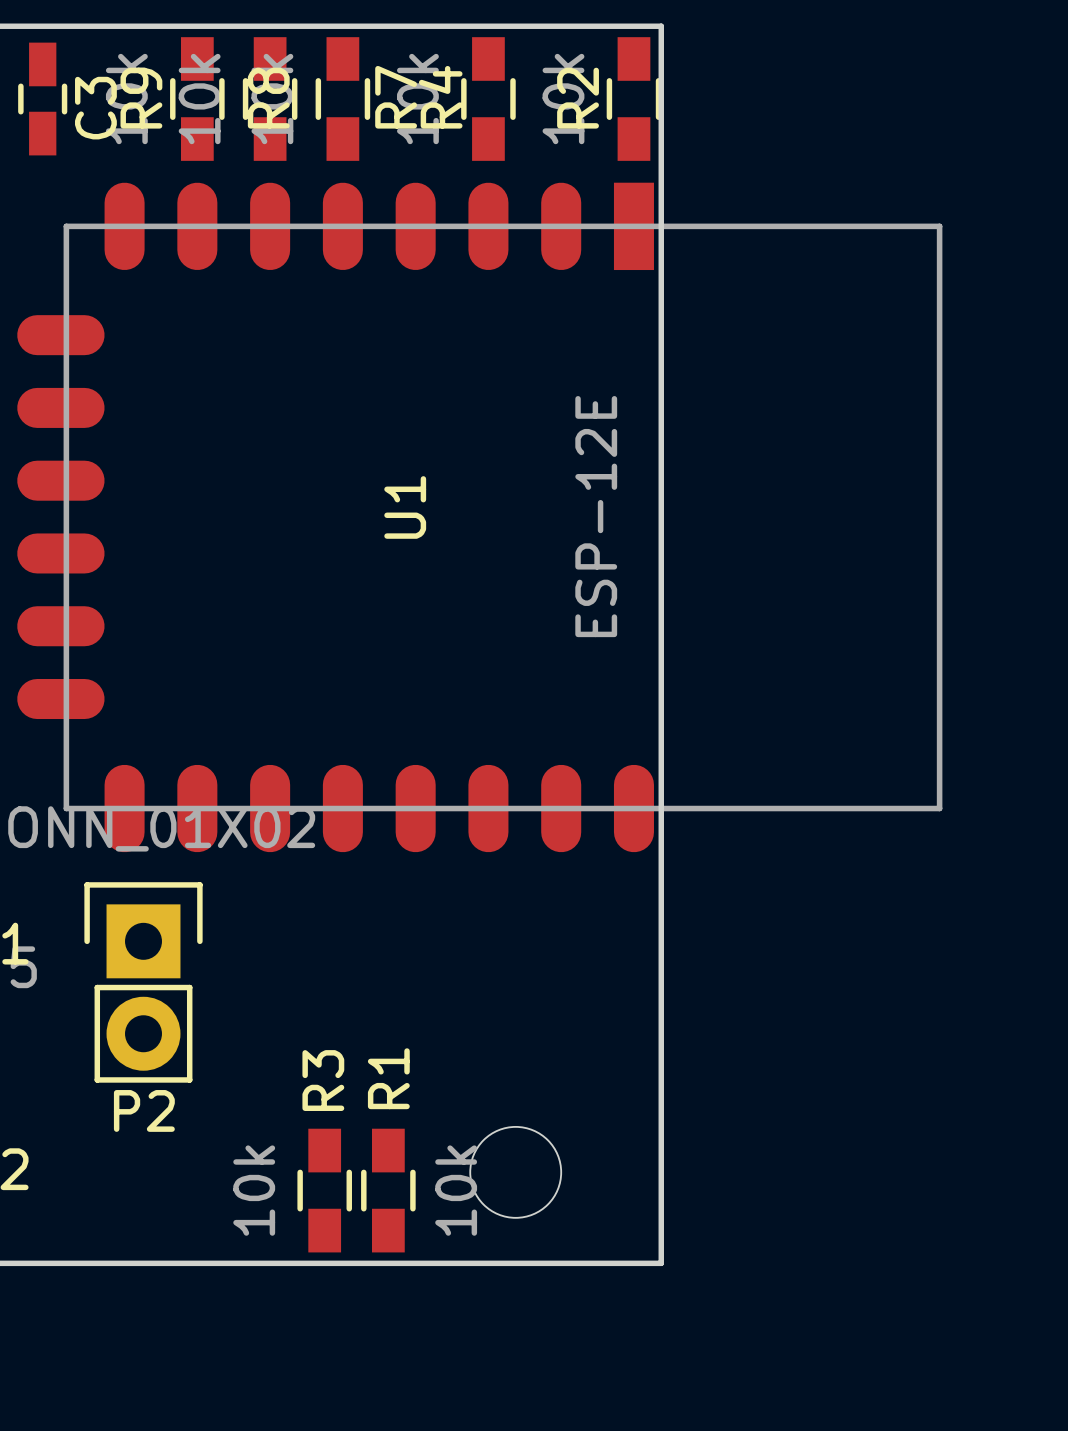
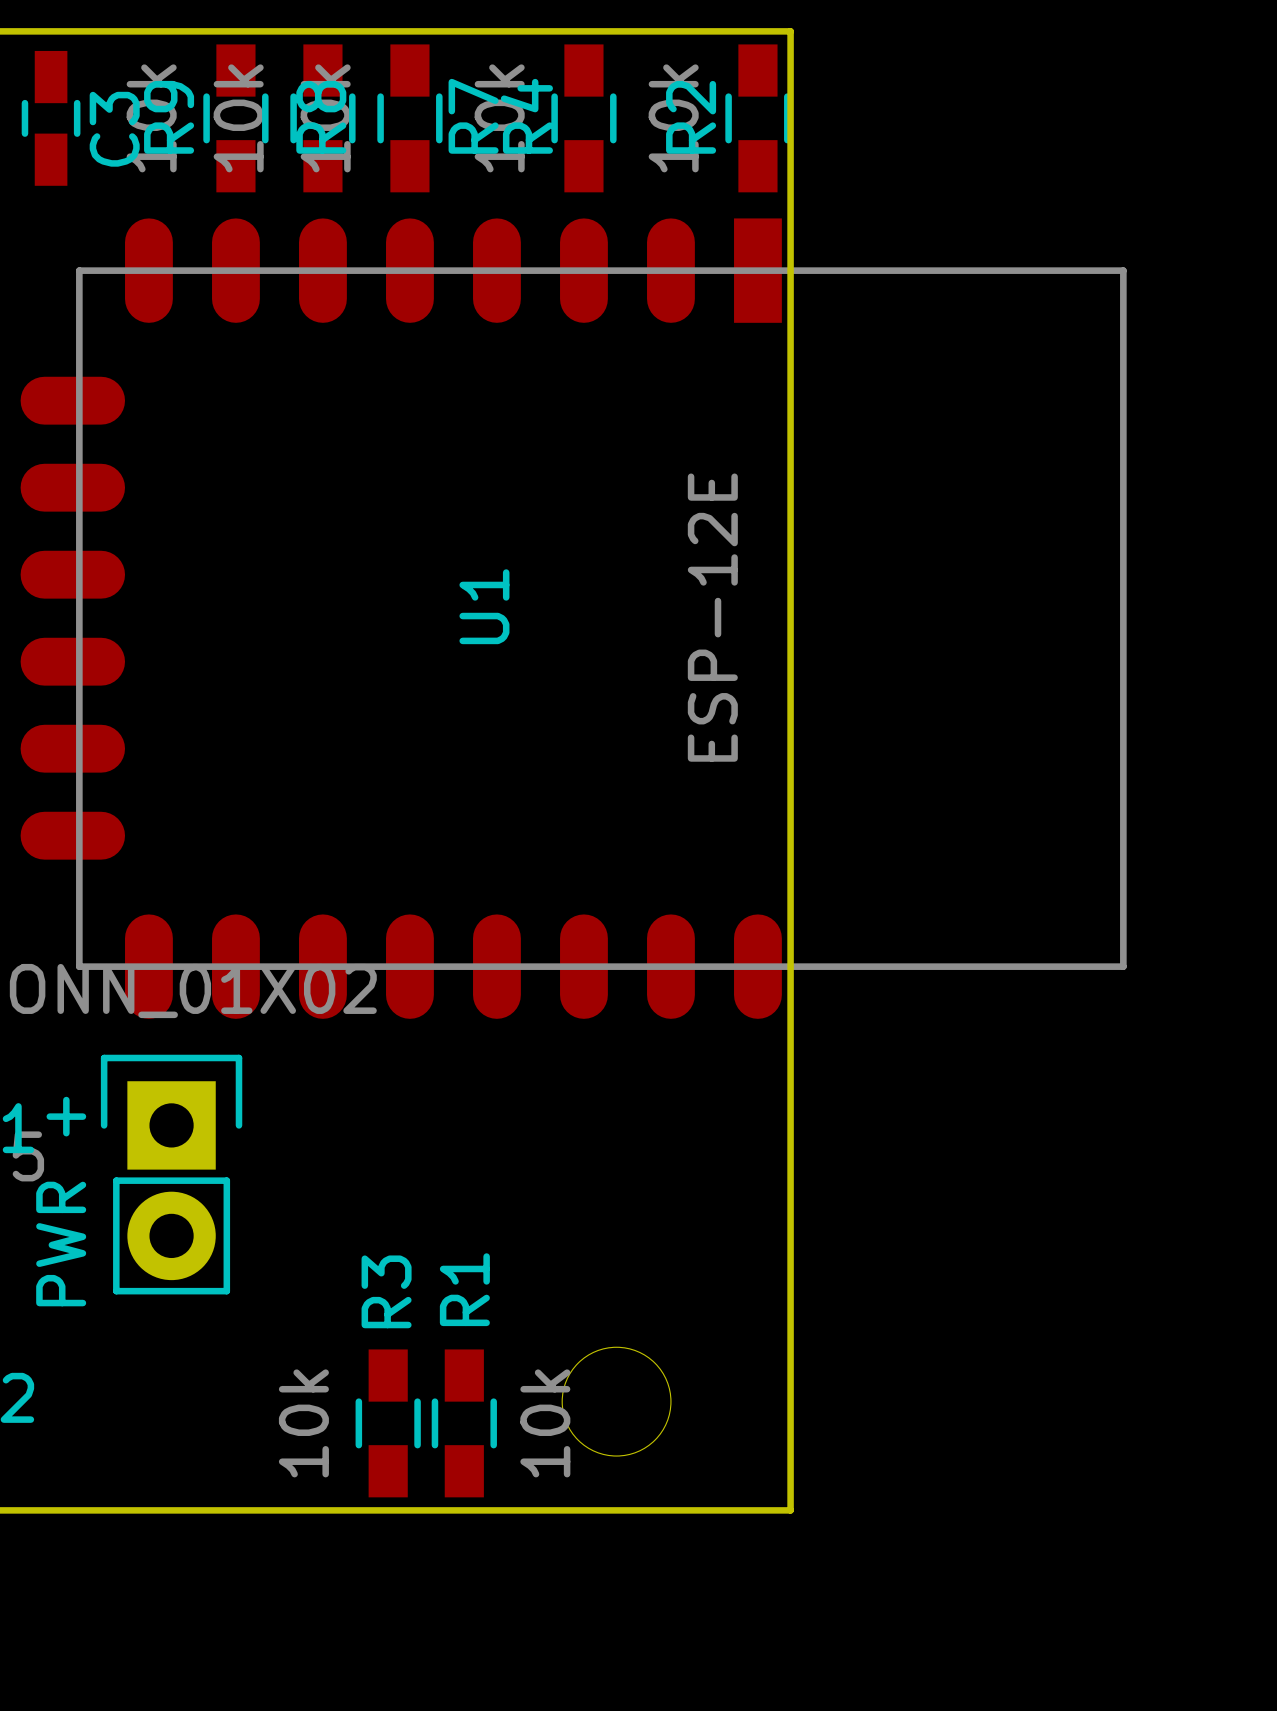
P2 name: P2 (144, 1110) -> PWR + (61, 1201)

